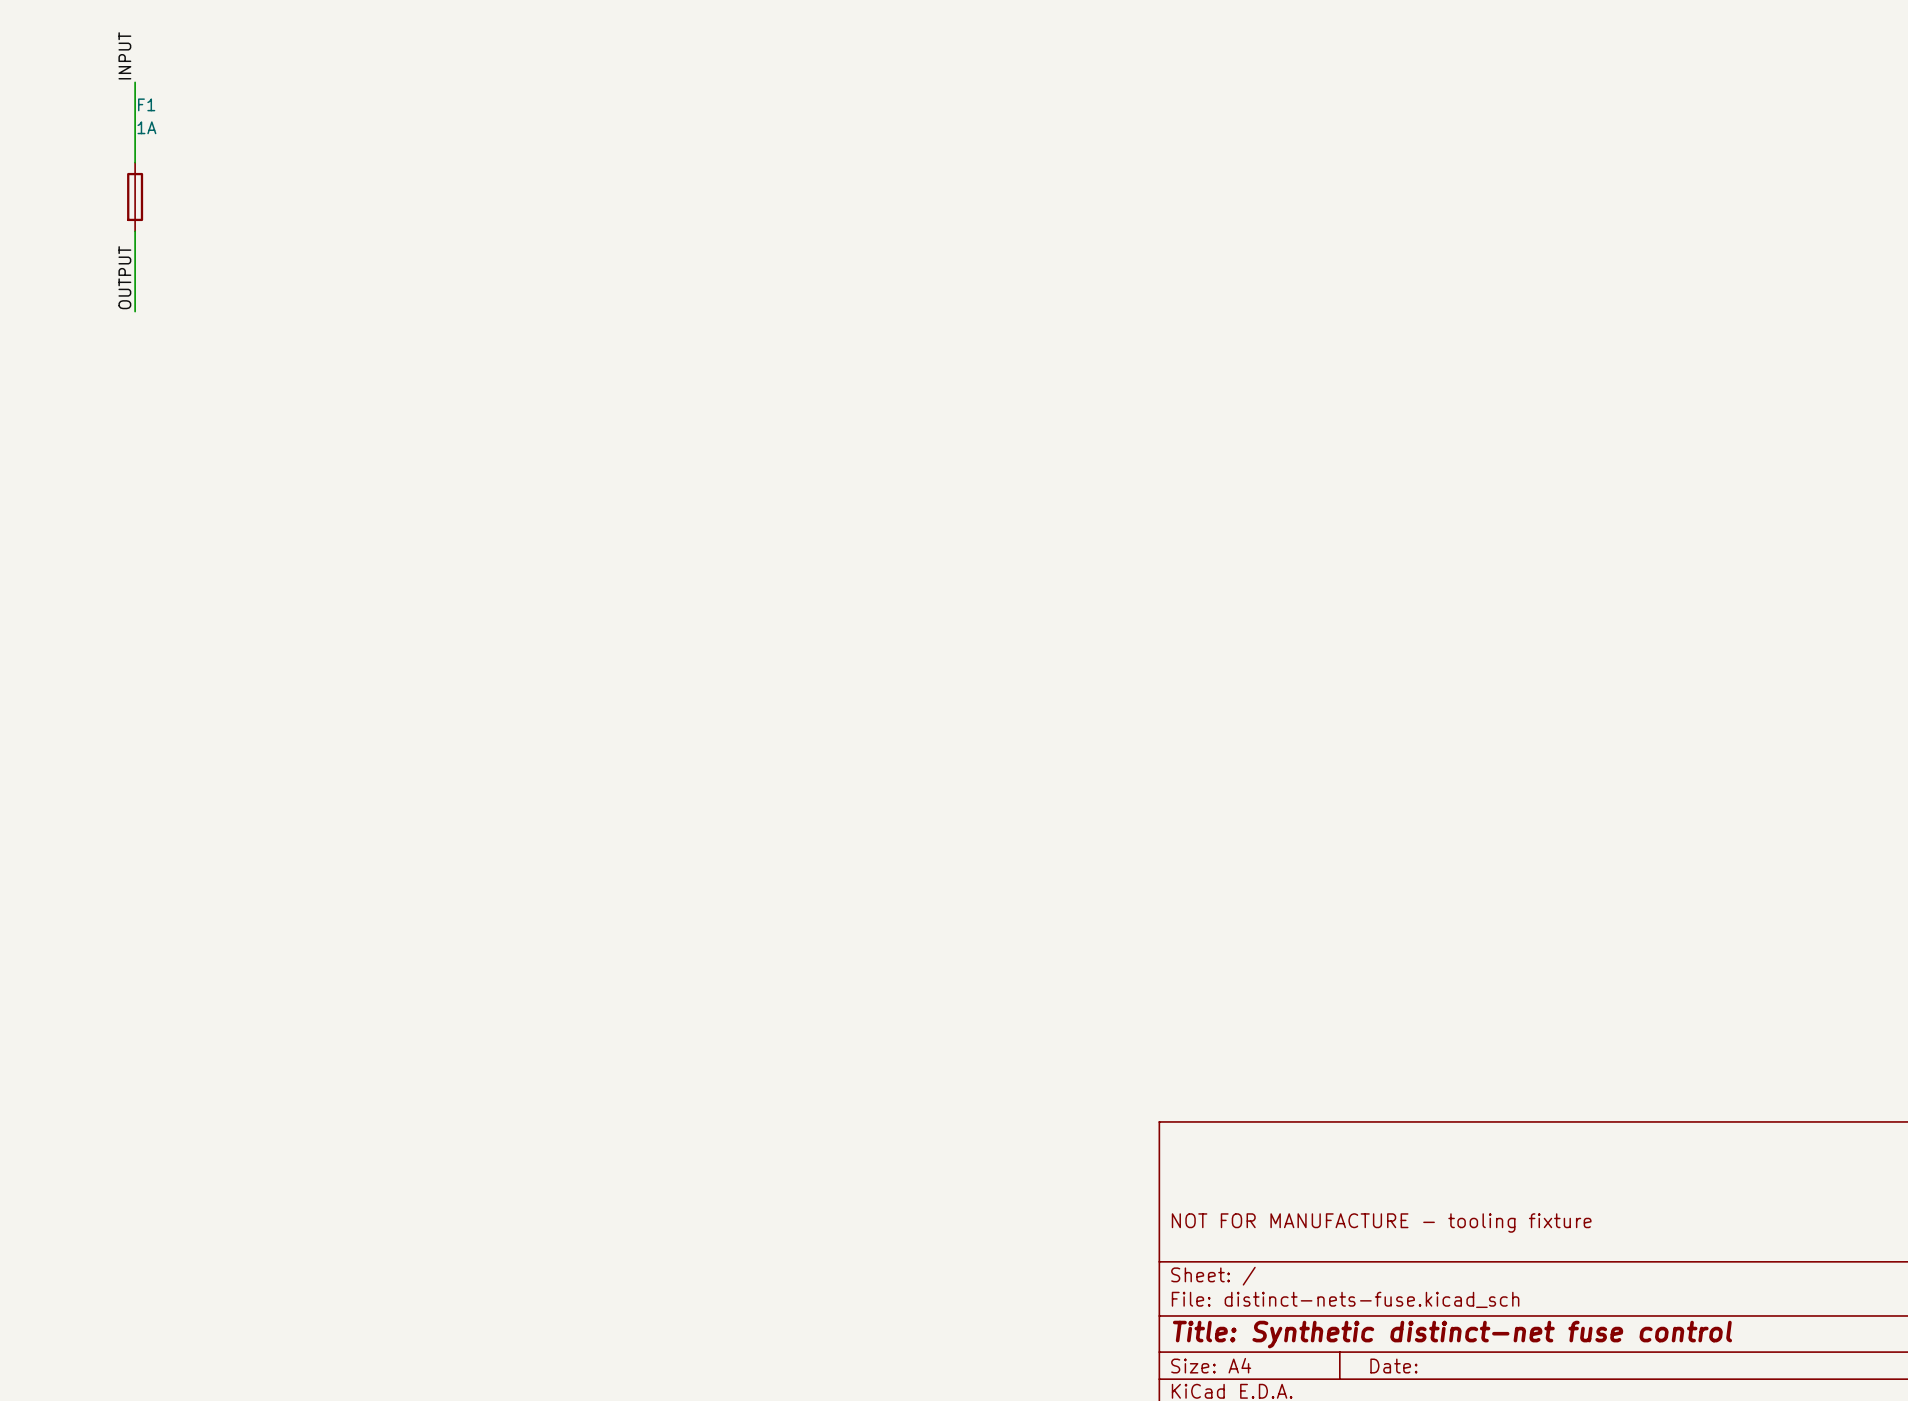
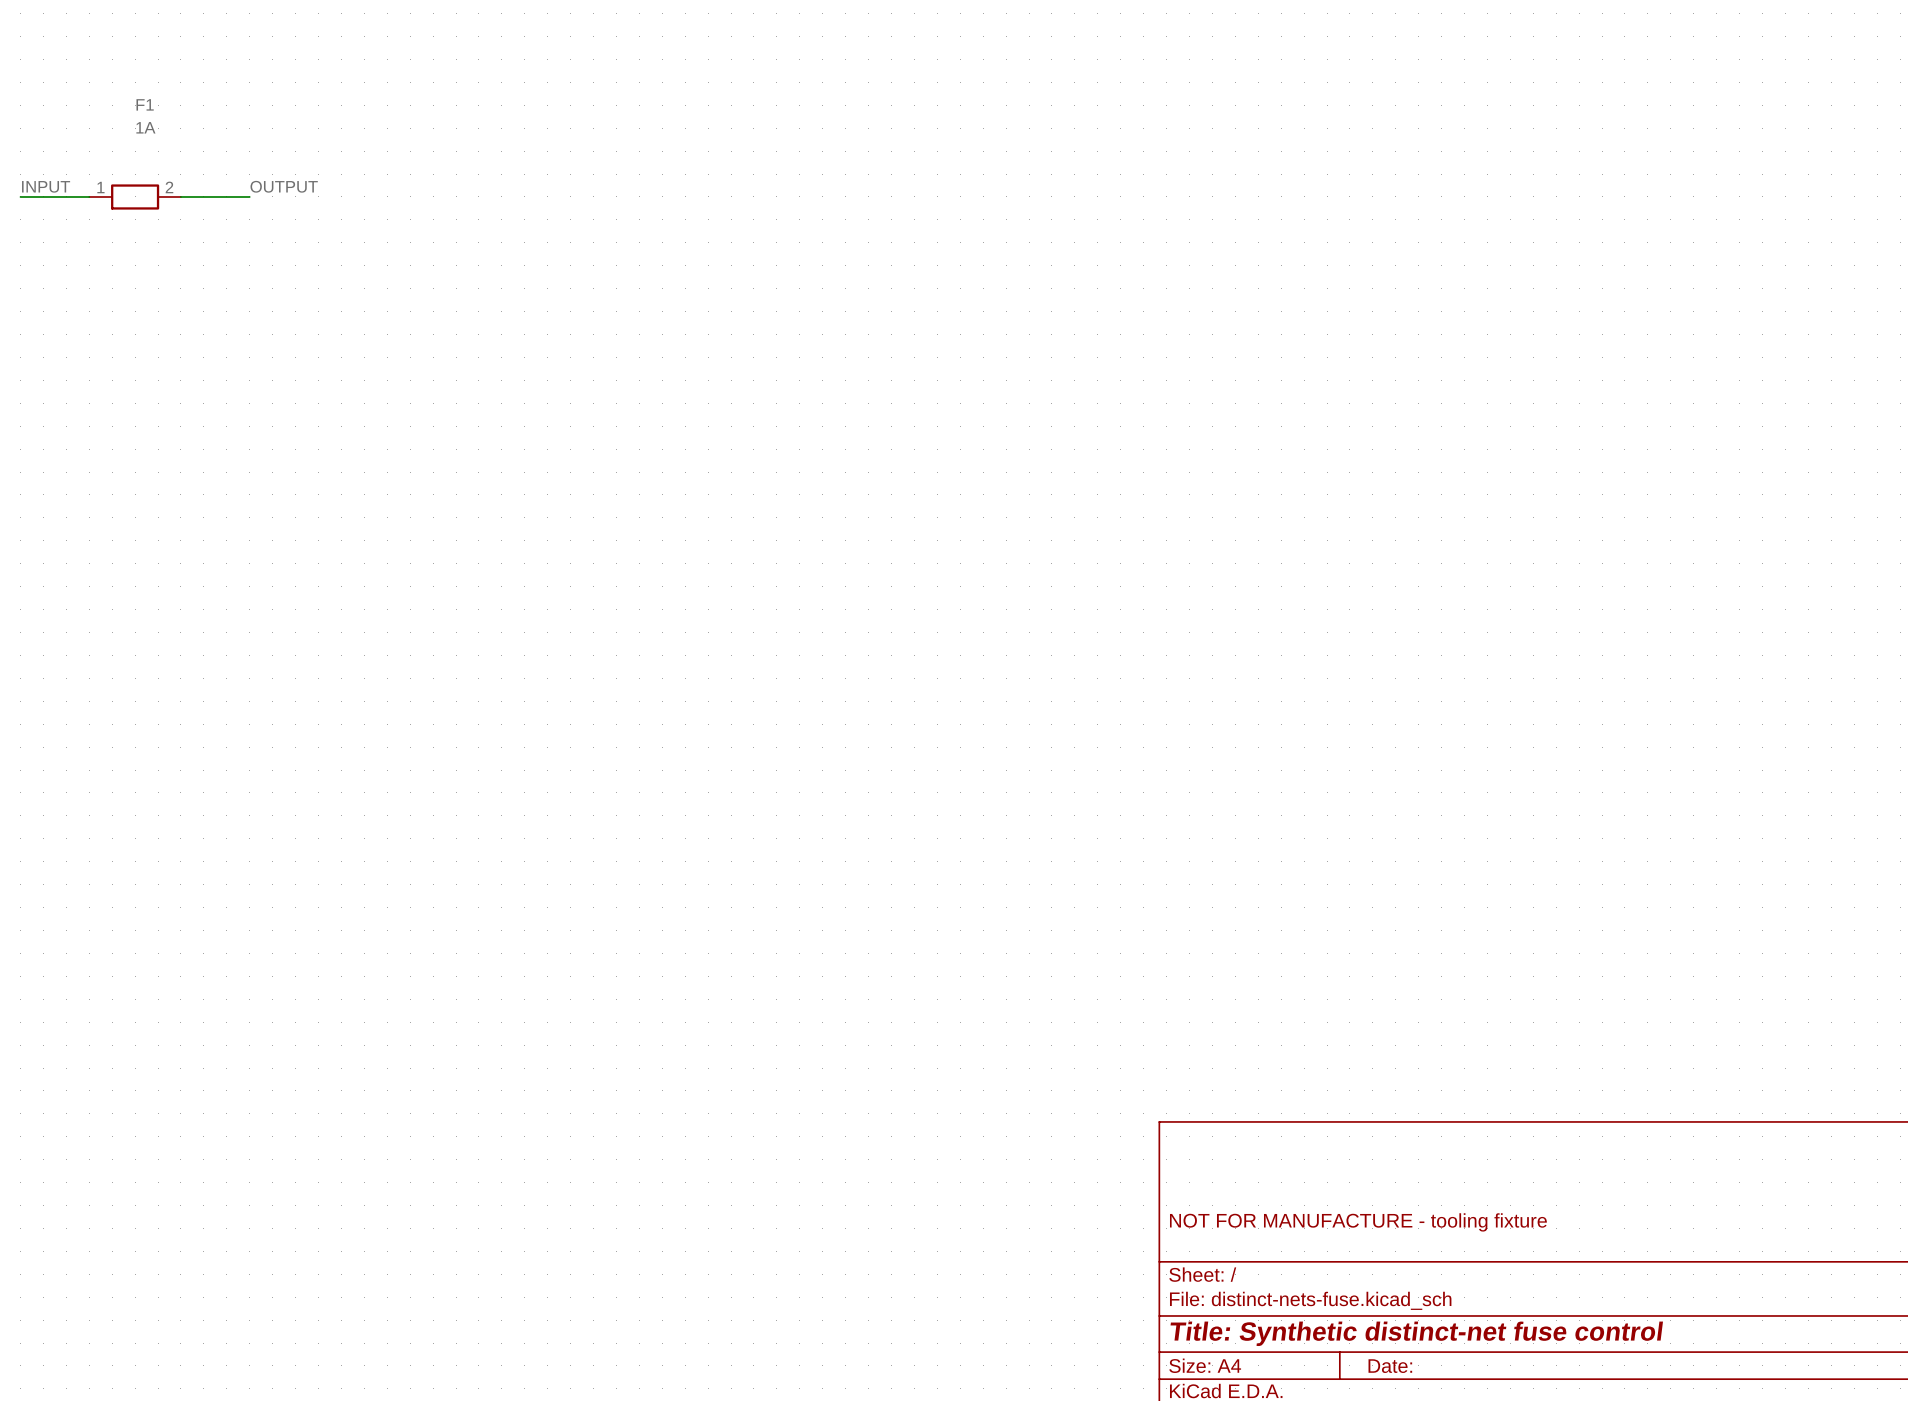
label rotation: 0° (124, 55) -> 90° clockwise (46, 186)
label position: INPUT (124, 55) -> INPUT (46, 186)
wire: (135, 82) (135, 162) -> none
F1 symbol: [127, 162, 144, 232] -> [89, 184, 181, 210]
wire: none -> (20, 196) (89, 196)
wire: none -> (180, 196) (249, 196)
wire: (135, 231) (135, 311) -> none
label rotation: 0° (124, 277) -> 90° clockwise (284, 186)
label position: OUTPUT (124, 277) -> OUTPUT (284, 186)

